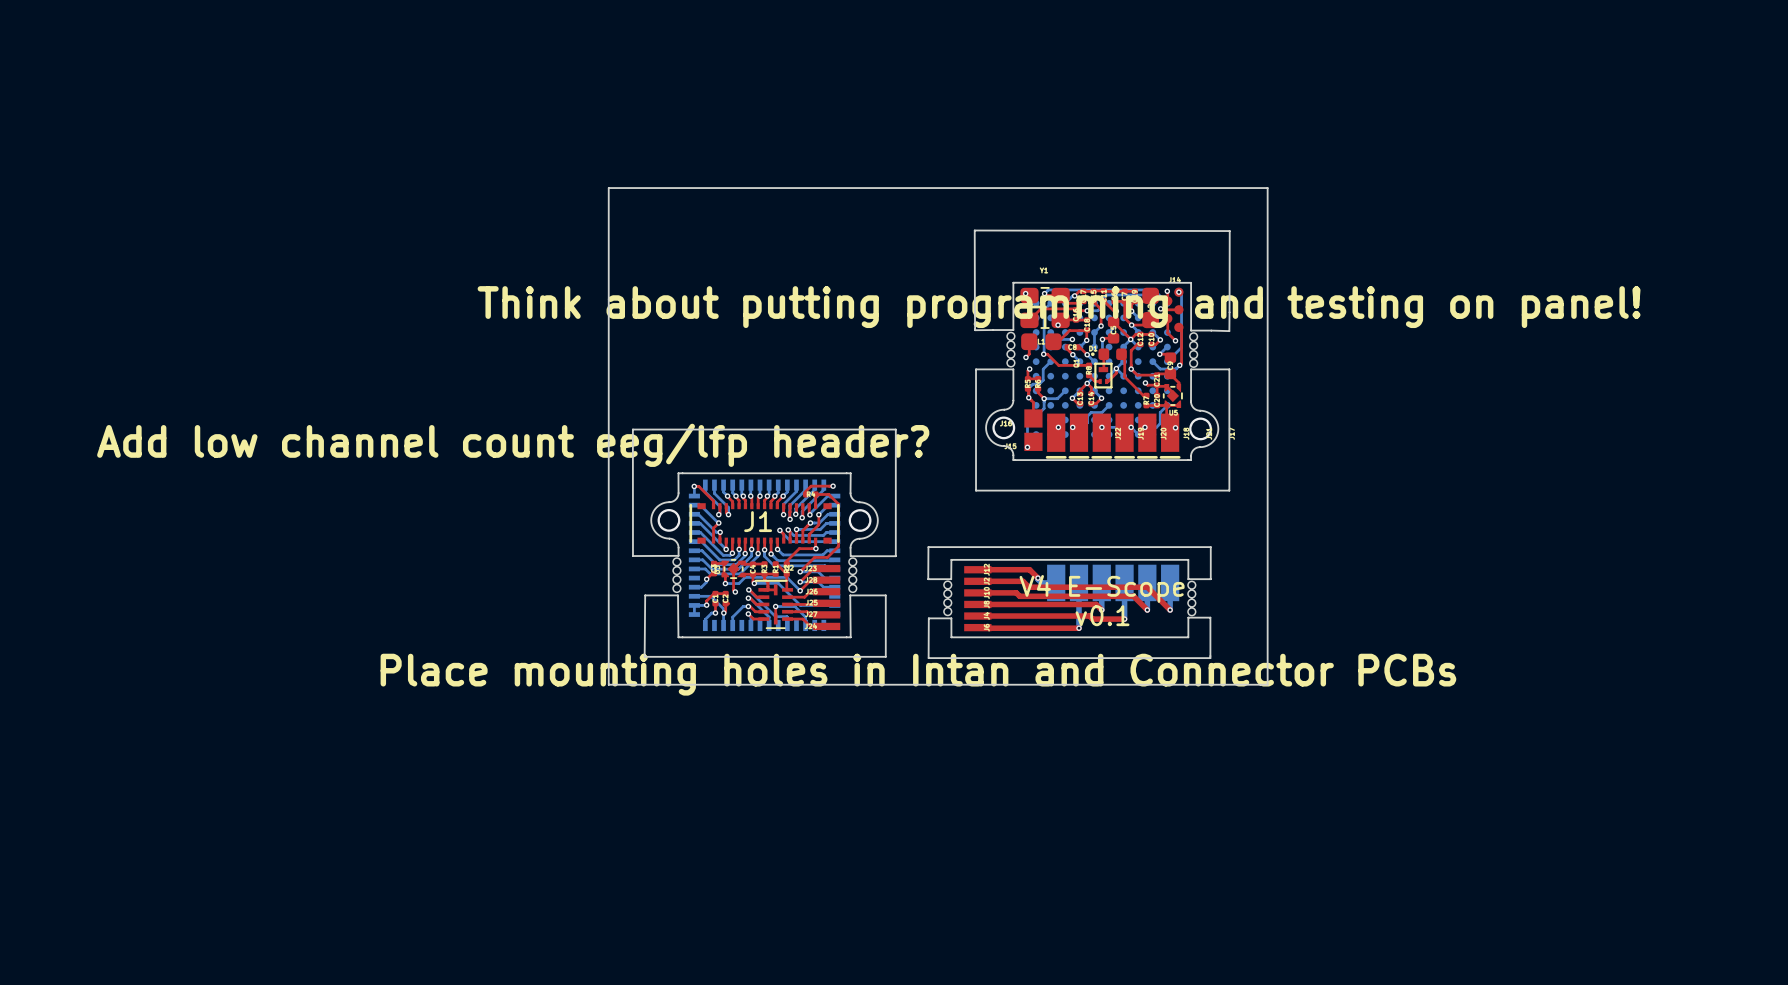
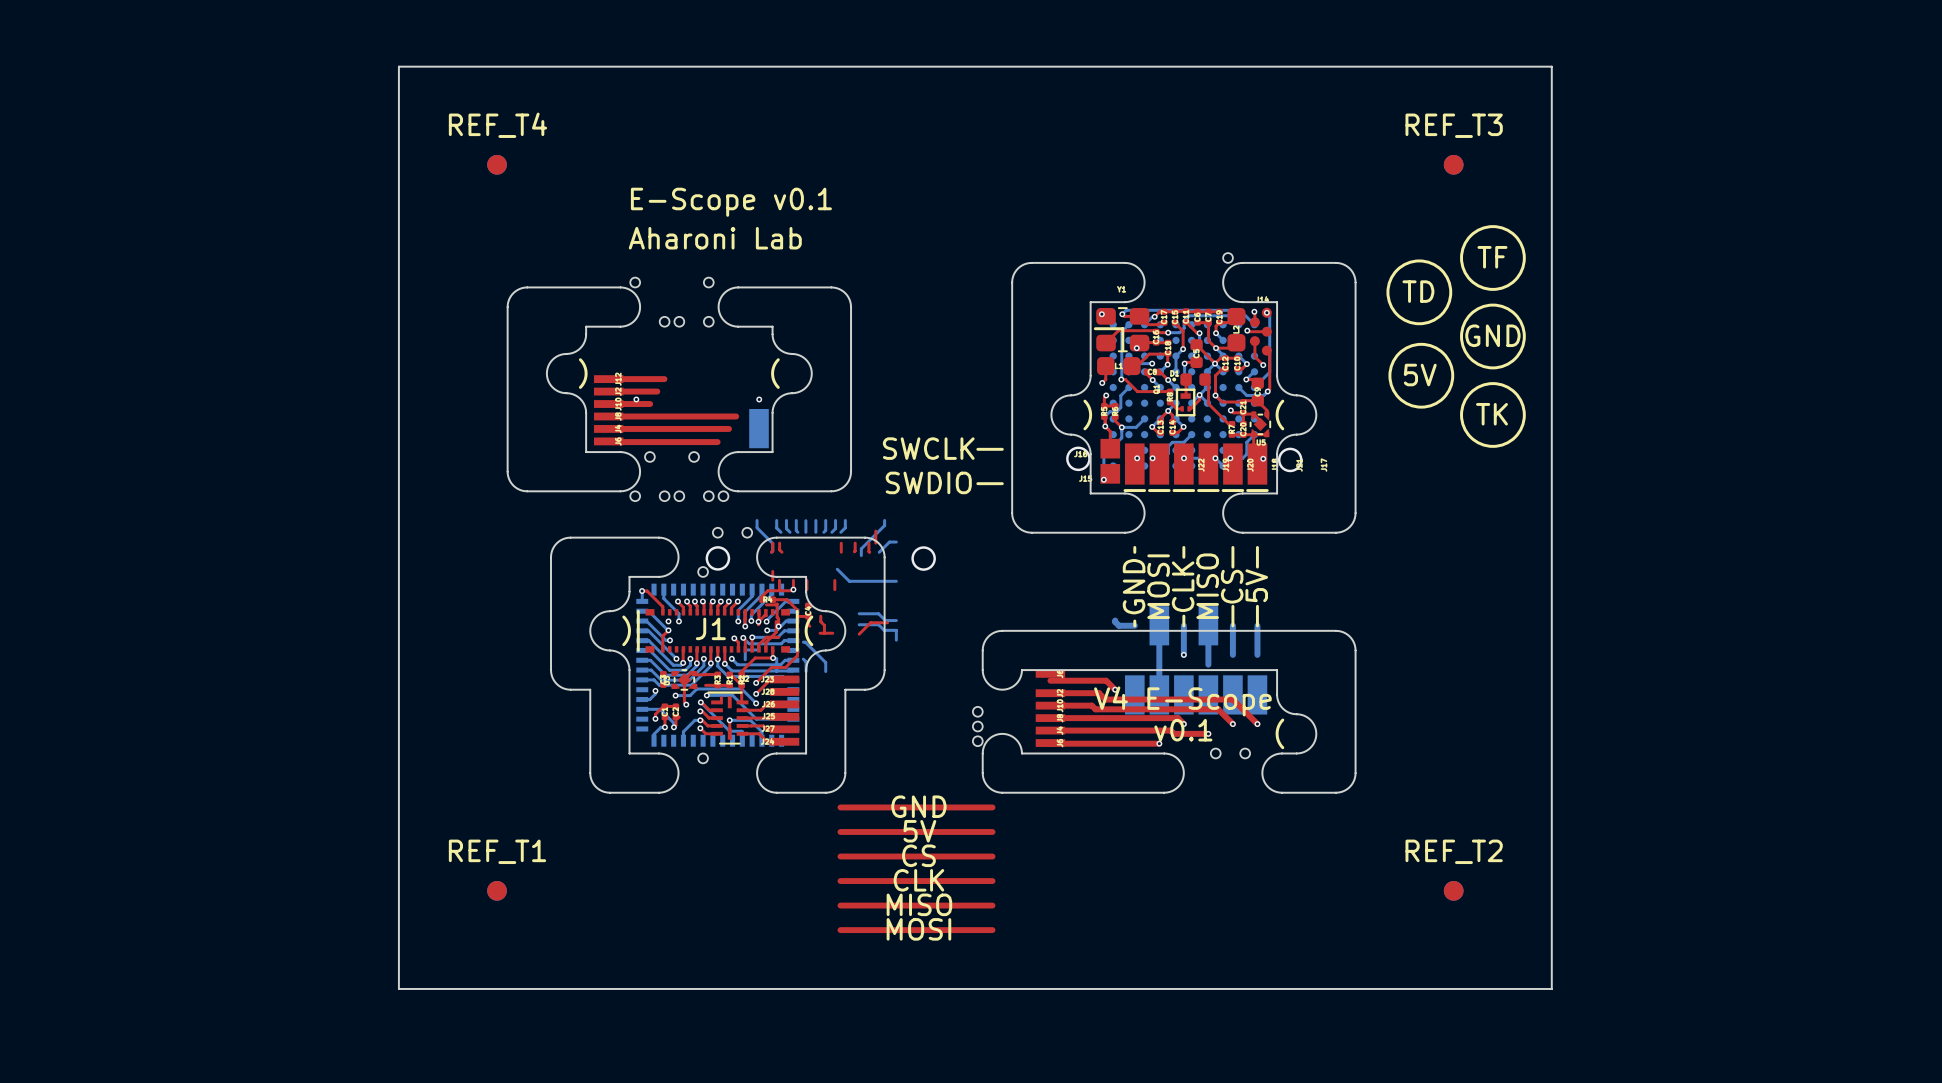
board edge: none -> (398, 66) (398, 988) (1551, 988) (1551, 66) (398, 66)
REF_T4: none -> (497, 164)
REF_T3: none -> (1453, 164)
board edge: (608, 188) (608, 684) (1267, 684) (1267, 188) (608, 188) -> none
text: none -> E-Scope v0.1 (731, 202)
drawing: none -> [1386, 225, 1526, 448]
text: none -> Aharoni Lab (715, 238)
board edge: (974, 230) (1229, 231) (1229, 331) (1191, 330) (1191, 282) (1013, 282) (1013, 330) (975, 330) (974, 230) -> none
text: none -> TF (1492, 257)
part: none -> (1228, 258)
part: none -> (635, 282)
part: none -> (708, 282)
board edge: none -> (527, 287) (623, 287) (632, 291) (637, 297) (639, 312) (632, 322) (623, 326) (586, 326) (585, 339) (582, 346) (574, 352) (554, 358) (548, 366) (546, 373) (548, 381) (554, 389) (574, 394) (583, 403) (586, 412) (586, 452) (623, 452) (636, 459) (639, 466) (639, 476) (630, 488) (620, 491) (527, 491) (517, 488) (510, 481) (507, 471) (507, 304) (515, 291) (527, 287)
board edge: none -> (738, 287) (833, 287) (843, 291) (848, 297) (851, 307) (851, 471) (848, 481) (841, 488) (831, 491) (738, 491) (728, 488) (721, 481) (719, 466) (728, 454) (738, 452) (772, 452) (772, 412) (775, 403) (784, 394) (804, 389) (811, 376) (810, 366) (804, 358) (784, 352) (776, 346) (773, 339) (772, 326) (735, 326) (722, 319) (718, 309) (720, 299) (726, 291) (738, 287)
text: none -> TD (1418, 291)
part: none -> (664, 321)
part: none -> (679, 321)
part: none -> (708, 321)
text: Think about putting programming and testing on panel! (1059, 307) -> none
text: none -> GND (1492, 335)
round board edge: [1006, 332, 1015, 341] -> none
round board edge: [1189, 332, 1198, 341] -> none
line: none -> (580, 359) (586, 373) (580, 387)
line: none -> (778, 359) (772, 373) (778, 387)
round board edge: [1006, 341, 1015, 349] -> none
round board edge: [1189, 341, 1198, 350] -> none
round board edge: [1006, 350, 1015, 359] -> none
round board edge: [1189, 350, 1198, 359] -> none
text: none -> 5V (1420, 375)
top track: none -> (608, 379) (664, 379)
round board edge: [1006, 359, 1015, 367] -> none
round board edge: [1189, 359, 1198, 368] -> none
top track: none -> (608, 391) (657, 391)
part: none -> (608, 391)
via: none -> (636, 399)
via: none -> (759, 399)
line: none -> (1084, 401) (1090, 414) (1084, 428)
line: none -> (1282, 401) (1277, 414) (1282, 428)
top track: none -> (608, 404) (650, 404)
part: none -> (608, 404)
text: none -> TK (1491, 414)
top track: none -> (608, 416) (736, 416)
part: none -> (608, 416)
part: none -> (759, 428)
top track: none -> (608, 428) (729, 428)
part: none -> (608, 428)
top track: none -> (608, 441) (717, 442)
part: none -> (608, 441)
text: none -> SWCLK (928, 448)
line: none -> (977, 449) (1002, 449)
part: none -> (649, 456)
part: none -> (694, 456)
board edge: (632, 429) (632, 556) (678, 555) (676, 542) (658, 534) (652, 527) (651, 520) (652, 513) (658, 505) (672, 501) (677, 497) (678, 473) (850, 473) (851, 497) (856, 501) (870, 506) (876, 513) (877, 520) (876, 527) (870, 534) (852, 542) (850, 556) (895, 556) (895, 429) (632, 429) -> none
text: Add low channel count eeg/lfp header? (513, 445) -> none
text: none -> SWDIO (928, 482)
line: none -> (977, 483) (1002, 483)
board edge: (1015, 460) (1013, 460) (1013, 452) (1009, 448) (997, 444) (991, 440) (986, 427) (991, 415) (997, 411) (1008, 408) (1012, 404) (1013, 369) (976, 369) (976, 490) (1229, 490) (1229, 369) (1191, 369) (1191, 405) (1195, 409) (1207, 412) (1213, 416) (1218, 428) (1213, 441) (1207, 445) (1194, 449) (1191, 453) (1191, 460) (1188, 460) -> (1090, 493) (1089, 446) (1080, 437) (1063, 433) (1057, 428) (1052, 420) (1052, 409) (1059, 399) (1080, 392) (1089, 383) (1090, 302) (1132, 300) (1143, 290) (1143, 277) (1136, 266) (1127, 263) (1026, 263) (1016, 270) (1012, 282) (1013, 520) (1019, 528) (1029, 532) (1130, 532) (1140, 525) (1144, 510) (1136, 497) (1124, 493)
board edge: (1047, 460) (1156, 460) -> (1277, 493) (1278, 446) (1286, 437) (1304, 433) (1310, 428) (1315, 420) (1315, 409) (1308, 399) (1286, 392) (1278, 383) (1277, 302) (1235, 300) (1224, 290) (1223, 277) (1230, 266) (1240, 263) (1341, 263) (1351, 270) (1355, 282) (1354, 520) (1347, 528) (1338, 532) (1237, 532) (1227, 525) (1223, 510) (1230, 497) (1242, 493)
part: none -> (635, 496)
part: none -> (664, 496)
part: none -> (679, 496)
part: none -> (708, 496)
part: none -> (723, 496)
bottom track: (714, 485) (714, 493) (728, 507) (728, 514) -> (663, 589) (663, 598) (678, 613) (678, 621)
bottom track: (796, 485) (796, 491) (783, 504) (783, 514) -> (752, 589) (752, 596) (738, 610) (738, 621)
bottom track: (805, 485) (805, 490) (789, 505) (790, 519) -> (761, 589) (761, 594) (744, 611) (745, 626)
bottom track: (814, 485) (814, 489) (795, 508) (795, 514) -> (771, 589) (771, 594) (751, 614) (751, 620)
bottom track: (694, 486) (694, 496) -> (642, 591) (642, 601)
top track: (694, 486) (698, 486) (713, 501) (713, 506) -> (642, 591) (647, 591) (662, 606) (662, 612)
via: (694, 486) -> none
top track: (833, 486) (811, 486) (805, 491) (805, 494) -> (791, 590) (767, 590) (762, 596) (762, 599)
via: (833, 486) -> none
part position: (810, 494) -> (767, 599)
top track: (815, 494) (828, 494) (838, 504) (838, 546) (827, 557) (814, 557) (800, 571) -> (773, 599) (786, 599) (797, 610) (797, 655) (785, 667) (771, 667) (756, 682)
part: none -> (717, 532)
part: none -> (747, 532)
top track: (727, 496) (732, 501) (732, 506) -> (677, 601) (683, 607) (683, 612)
via: (727, 496) -> none
top track: (736, 496) (739, 500) (739, 506) -> (687, 601) (690, 606) (690, 612)
via: (736, 496) -> none
top track: (743, 496) (745, 506) -> (694, 601) (697, 612)
via: (743, 496) -> none
top track: (750, 496) (751, 506) -> (702, 601) (704, 612)
via: (750, 496) -> none
top track: (759, 496) (758, 506) -> (712, 601) (710, 603) (710, 612)
via: (759, 496) -> none
top track: (767, 496) (764, 500) (764, 506) -> (720, 601) (717, 606) (717, 612)
via: (767, 496) -> none
top track: (774, 496) (770, 501) (770, 506) -> (728, 601) (724, 607) (724, 612)
via: (774, 496) -> none
top track: (783, 496) (777, 502) (777, 506) -> (737, 601) (731, 607) (731, 612)
via: (783, 496) -> none
bottom track: (834, 496) (827, 496) (809, 514) -> (793, 601) (785, 601) (766, 621)
board edge: none -> (570, 537) (661, 537) (670, 541) (677, 549) (677, 562) (672, 571) (661, 576) (629, 576) (629, 594) (625, 603) (617, 609) (597, 615) (591, 623) (590, 630) (596, 644) (602, 648) (619, 653) (628, 665) (629, 753) (664, 754) (670, 757) (677, 765) (677, 780) (666, 791) (609, 792) (596, 786) (590, 773) (590, 689) (565, 689) (558, 685) (552, 677) (551, 554) (558, 541) (570, 537)
board edge: none -> (776, 537) (867, 537) (876, 541) (883, 552) (883, 675) (880, 682) (872, 688) (845, 689) (845, 775) (841, 785) (830, 792) (774, 792) (764, 788) (757, 778) (758, 765) (766, 756) (774, 753) (806, 753) (806, 665) (815, 653) (837, 646) (845, 633) (843, 623) (837, 615) (818, 609) (810, 603) (806, 594) (806, 576) (774, 576) (761, 569) (757, 559) (758, 549) (764, 541) (776, 537)
bottom track: (694, 505) (700, 505) (718, 522) -> (642, 611) (648, 611) (668, 630)
top track: (790, 506) (790, 519) -> (745, 612) (745, 626)
top track: (802, 506) (802, 517) -> (759, 612) (758, 624)
line: none -> (1134, 547) (1134, 552)
line: none -> (1183, 547) (1183, 557)
line: none -> (1232, 547) (1232, 567)
line: none -> (1257, 547) (1257, 567)
bottom track: (694, 514) (698, 514) (716, 532) (720, 532) -> (642, 621) (646, 621) (665, 640) (669, 640)
via: (718, 514) -> none
via: (728, 514) -> none
via: (783, 514) -> none
via: (795, 514) -> none
via: (809, 514) -> none
top track: (818, 514) (818, 524) (809, 534) (809, 540) -> (776, 621) (776, 632) (765, 642) (765, 649)
via: (818, 514) -> none
bottom track: (834, 514) (828, 514) (819, 522) (810, 522) -> (793, 621) (786, 621) (776, 630) (767, 630)
via: (802, 517) -> none
via: (790, 519) -> none
top track: (718, 522) (713, 528) (713, 540) -> (668, 630) (662, 636) (662, 649)
via: (718, 522) -> none
top track: (810, 522) (802, 530) (802, 540) -> none
via: (810, 522) -> none
bottom track: (694, 523) (700, 523) (726, 549) -> (642, 630) (648, 630) (676, 658)
J1 position: (764, 523) -> (717, 630)
bottom track: (834, 523) (826, 523) (820, 529) (796, 529) -> (793, 630) (784, 630) (777, 637) (752, 637)
bottom track: (788, 529) (793, 535) (823, 535) (826, 532) (834, 532) -> (743, 637) (749, 643) (781, 643) (784, 640) (793, 640)
top track: (788, 529) (790, 531) (790, 540) -> (743, 637) (745, 639) (745, 649)
via: (788, 529) -> none
top track: (796, 529) (796, 540) -> (752, 637) (752, 649)
via: (796, 529) -> none
top track: (779, 530) (783, 534) (783, 540) -> (734, 638) (738, 642) (738, 649)
via: (779, 530) -> none
part: none -> (703, 571)
bottom track: (694, 532) (700, 532) (723, 555) (730, 555) (732, 553) -> (642, 640) (648, 640) (673, 665) (680, 665) (683, 662)
via: (720, 532) -> none
top track: (732, 540) (732, 553) -> (683, 649) (683, 662)
top track: (745, 540) (745, 553) -> (697, 649) (696, 663)
top track: (758, 540) (758, 553) -> (710, 649) (710, 663)
top track: (764, 540) (764, 549) -> (717, 649) (717, 659)
top track: (771, 540) (771, 554) -> (724, 649) (724, 663)
top track: (815, 540) (815, 548) (799, 548) (786, 561) (786, 564) -> (772, 649) (773, 658) (755, 658) (741, 671) (741, 674)
bottom track: (694, 541) (701, 541) (719, 559) (734, 559) (739, 555) (739, 549) -> (642, 650) (649, 650) (669, 670) (685, 670) (690, 665) (690, 658)
text: none -> 5V (1256, 585)
text: none -> GND (1134, 586)
text: none -> MOSI (1158, 586)
text: none -> CLK (1183, 586)
text: none -> MISO (1207, 586)
text: none -> CS (1232, 586)
board edge: (928, 547) (928, 579) (951, 579) (951, 559) (1188, 559) (1188, 579) (1210, 579) (1210, 547) (928, 547) -> none
via: (815, 548) -> none
via: (726, 549) -> none
bottom track: (751, 549) (751, 555) (738, 569) (712, 569) (702, 559) (694, 559) -> (703, 658) (703, 665) (689, 680) (661, 680) (651, 670) (642, 670)
via: (751, 549) -> none
bottom track: (764, 549) (764, 556) (774, 565) (825, 565) (828, 568) (834, 568) -> (717, 659) (717, 666) (727, 676) (782, 676) (786, 679) (793, 679)
via: (764, 549) -> none
bottom track: (777, 549) (783, 554) (822, 554) (827, 550) (834, 550) -> (731, 658) (737, 664) (780, 664) (785, 660) (793, 660)
via: (777, 549) -> none
via: none -> (642, 591)
bottom track: (694, 550) (702, 550) (715, 564) (736, 564) (745, 553) -> (642, 660) (650, 660) (665, 675) (687, 675) (696, 665) (696, 663)
via: (732, 553) -> none
via: (745, 553) -> none
bottom track: (758, 553) (758, 555) (740, 573) (710, 573) (705, 568) (694, 568) -> (710, 663) (710, 665) (691, 685) (659, 685) (653, 679) (642, 679)
via: (758, 553) -> none
bottom track: (771, 554) (777, 560) (834, 559) -> (724, 663) (732, 670) (793, 670)
via: (771, 554) -> none
part position: (764, 555) -> (717, 665)
round board edge: [672, 557, 681, 566] -> none
round board edge: [848, 557, 857, 566] -> none
via: none -> (677, 601)
via: none -> (687, 601)
via: none -> (694, 601)
via: none -> (702, 601)
via: none -> (712, 601)
via: none -> (720, 601)
via: none -> (728, 601)
via: none -> (737, 601)
top track: (753, 564) (739, 562) (733, 568) (733, 590) (735, 591) -> (705, 674) (691, 673) (684, 679) (684, 702) (686, 704)
top track: (753, 564) (764, 564) -> (705, 674) (717, 674)
top track: (775, 564) (786, 574) (787, 589) -> (729, 674) (741, 685) (742, 702)
line: none -> (1232, 606) (1232, 625)
line: none -> (1257, 606) (1257, 625)
round board edge: [672, 566, 681, 575] -> none
round board edge: [848, 566, 857, 575] -> none
part position: (714, 568) -> (663, 679)
part position: (733, 568) -> (684, 679)
top track: (826, 568) (813, 568) (800, 581) -> (784, 679) (770, 679) (756, 693)
part position: (826, 568) -> (784, 679)
part position: (764, 569) -> (717, 679)
part position: (775, 569) -> (729, 679)
part position: (786, 569) -> (741, 679)
top track: (977, 569) (1029, 569) (1037, 578) -> (1050, 680) (1106, 680) (1115, 689)
part position: (977, 569) -> (608, 379)
via: (800, 571) -> none
line: none -> (1183, 616) (1183, 625)
line: none -> (623, 616) (629, 630) (623, 644)
top track: (753, 574) (775, 574) -> (705, 685) (729, 685)
line: none -> (811, 616) (806, 630) (811, 644)
round board edge: [672, 575, 681, 584] -> none
round board edge: [848, 575, 857, 584] -> none
via: none -> (668, 621)
via: none -> (678, 621)
via: none -> (738, 621)
via: none -> (751, 620)
via: (1037, 578) -> none
line: none -> (1134, 621) (1134, 625)
bottom track: (706, 579) (706, 581) (701, 587) (694, 587) -> (655, 690) (655, 693) (649, 699) (642, 699)
via: none -> (766, 621)
part position: (826, 580) -> (784, 691)
via: (800, 581) -> none
round board edge: [943, 581, 952, 589] -> none
top track: (977, 581) (1022, 581) (1028, 587) (1147, 587) (1170, 609) -> (1050, 693) (1099, 693) (1105, 699) (1232, 699) (1257, 724)
part position: (977, 581) -> (1050, 693)
round board edge: [1187, 581, 1196, 590] -> none
part: (1056, 582) -> none
part: (1101, 582) -> none
part: (1147, 582) -> none
part: (1170, 582) -> none
via: none -> (745, 626)
bottom track: (725, 583) (738, 583) (745, 577) (786, 577) (800, 590) -> (675, 695) (690, 695) (696, 688) (741, 688) (756, 703)
bottom track: (754, 583) (778, 583) (800, 605) (834, 605) -> (706, 695) (732, 695) (756, 719) (793, 719)
via: (754, 583) -> none
round board edge: [672, 584, 681, 593] -> none
round board edge: [848, 584, 857, 593] -> none
via: none -> (668, 630)
via: none -> (767, 630)
text position: V4 E-Scope (1102, 588) -> V4 E-Scope (1182, 701)
bottom track: (748, 589) (775, 616) (786, 616) (787, 625) -> (700, 702) (729, 731) (741, 731) (742, 740)
top track: (748, 589) (756, 597) (763, 597) -> (700, 702) (709, 710) (717, 710)
via: (748, 589) -> none
round board edge: [943, 589, 952, 598] -> none
via: (800, 590) -> none
round board edge: [1187, 590, 1196, 598] -> none
via: (735, 591) -> none
top track: (826, 591) (810, 591) (804, 597) (787, 597) -> (784, 704) (766, 704) (760, 710) (742, 710)
part position: (826, 591) -> (784, 704)
top track: (977, 592) (1016, 592) (1019, 596) (1133, 596) (1147, 609) -> (1050, 705) (1091, 705) (1095, 709) (1218, 709) (1232, 724)
part position: (977, 592) -> (1050, 705)
via: none -> (752, 637)
via: none -> (734, 638)
via: none -> (743, 637)
board edge: (645, 595) (644, 656) (885, 656) (885, 595) (850, 595) (850, 637) (678, 637) (678, 595) (645, 595) -> none
via: none -> (669, 640)
bottom track: (694, 596) (710, 596) (723, 609) (723, 613) -> (642, 709) (660, 709) (673, 723) (673, 727)
part position: (715, 598) -> (664, 711)
part position: (725, 598) -> (675, 711)
top track: (748, 598) (756, 604) (763, 604) -> (700, 711) (709, 718) (717, 718)
via: (748, 598) -> none
round board edge: [943, 598, 952, 607] -> none
round board edge: [1187, 599, 1196, 607] -> none
top track: (715, 603) (715, 613) -> (664, 717) (664, 727)
top track: (728, 603) (725, 603) (723, 613) -> (679, 717) (675, 717) (675, 725) (673, 727)
top track: (826, 603) (787, 604) -> (784, 716) (742, 718)
part position: (826, 603) -> (784, 716)
part position: (773, 604) -> (727, 718)
top track: (977, 604) (1096, 604) (1101, 609) -> (1050, 718) (1177, 718) (1183, 724)
part position: (977, 604) -> (1050, 718)
via: (706, 605) -> none
bottom track: (748, 606) (743, 606) (732, 617) (732, 625) -> (700, 720) (694, 720) (683, 731) (683, 740)
top track: (748, 606) (755, 611) (763, 611) -> (700, 720) (707, 725) (717, 725)
via: (748, 606) -> none
bottom track: (775, 606) (794, 606) (805, 617) (805, 625) -> (729, 720) (750, 720) (761, 731) (761, 740)
via: (775, 606) -> none
round board edge: [943, 607, 952, 616] -> none
round board edge: [1187, 607, 1196, 616] -> none
via: (1147, 609) -> none
via: (1170, 609) -> none
top track: (787, 611) (807, 611) (810, 614) (826, 614) -> (742, 725) (763, 725) (766, 729) (784, 729)
via: none -> (773, 658)
via: none -> (676, 658)
via: none -> (690, 658)
via: none -> (703, 658)
via: none -> (731, 658)
bottom track: (715, 613) (711, 613) (705, 619) (705, 625) -> (664, 727) (660, 727) (654, 734) (654, 740)
via: (715, 613) -> none
via: (723, 613) -> none
top track: (748, 613) (753, 619) (763, 619) -> (700, 728) (705, 733) (717, 733)
via: (748, 613) -> none
via: none -> (717, 659)
part position: (826, 614) -> (784, 729)
text position: v0.1 (1102, 615) -> v0.1 (1183, 730)
top track: (977, 616) (1089, 616) (1092, 619) (1124, 619) -> (1050, 730) (1170, 730) (1174, 733) (1208, 733)
part position: (977, 616) -> (1050, 730)
via: none -> (683, 662)
via: none -> (696, 663)
via: none -> (710, 663)
via: none -> (724, 663)
top track: (787, 619) (803, 619) (810, 626) (826, 626) -> (742, 733) (759, 733) (767, 741) (784, 741)
via: (1124, 619) -> none
board edge: (1188, 624) (1188, 617) (1210, 617) (1210, 658) (928, 658) (928, 618) (951, 618) (951, 637) (1188, 637) -> (1277, 670) (1021, 670) (1020, 677) (1014, 685) (999, 689) (990, 685) (984, 677) (982, 647) (990, 634) (1002, 630) (1343, 632) (1351, 638) (1355, 650) (1355, 775) (1351, 785) (1345, 790) (1335, 792) (1279, 792) (1270, 788) (1264, 782) (1262, 770) (1268, 759) (1276, 754) (1304, 751) (1312, 745) (1316, 736) (1314, 726) (1308, 718) (1289, 712) (1281, 706) (1277, 697) (1277, 684)
part position: (826, 626) -> (784, 741)
top track: (977, 627) (1078, 628) -> (1050, 743) (1159, 743)
via: (1078, 628) -> none
via: none -> (756, 682)
via: none -> (1115, 689)
via: none -> (655, 690)
via: none -> (756, 693)
via: none -> (675, 695)
via: none -> (706, 695)
part: none -> (1134, 694)
part: none -> (1159, 694)
part: none -> (1183, 694)
part: none -> (1208, 694)
part: none -> (1232, 694)
part: none -> (1257, 694)
via: none -> (700, 702)
via: none -> (756, 703)
via: none -> (686, 704)
top track: none -> (675, 706) (663, 706) (655, 714) (655, 718)
via: none -> (700, 711)
part: none -> (977, 711)
via: none -> (655, 718)
via: none -> (700, 720)
via: none -> (729, 720)
line: none -> (1282, 719) (1277, 733) (1282, 747)
text: Place mounting holes in Intan and Connector PCBs (918, 674) -> none
via: none -> (1183, 724)
via: none -> (1232, 724)
via: none -> (1257, 724)
part: none -> (977, 726)
via: none -> (664, 727)
via: none -> (673, 727)
via: none -> (700, 728)
via: none -> (1208, 733)
part: none -> (977, 741)
part: none -> (1050, 743)
via: none -> (1159, 743)
board edge: none -> (982, 753) (984, 780) (990, 788) (999, 792) (1166, 792) (1178, 786) (1183, 775) (1179, 761) (1169, 754) (1021, 753) (1017, 741) (1004, 734) (990, 737) (984, 745) (982, 753)
part: none -> (1215, 753)
part: none -> (1245, 753)
part: none -> (703, 758)
top track: none -> (840, 807) (992, 807)
text: none -> GND (918, 806)
text: none -> 5V (919, 831)
top track: none -> (840, 831) (992, 831)
text: none -> CS (918, 855)
top track: none -> (840, 856) (992, 856)
text: none -> CLK (918, 880)
top track: none -> (840, 881) (992, 881)
REF_T1: none -> (497, 890)
REF_T2: none -> (1453, 890)
top track: none -> (840, 905) (992, 905)
text: none -> MISO (919, 904)
text: none -> MOSI (918, 929)
top track: none -> (840, 930) (992, 930)

